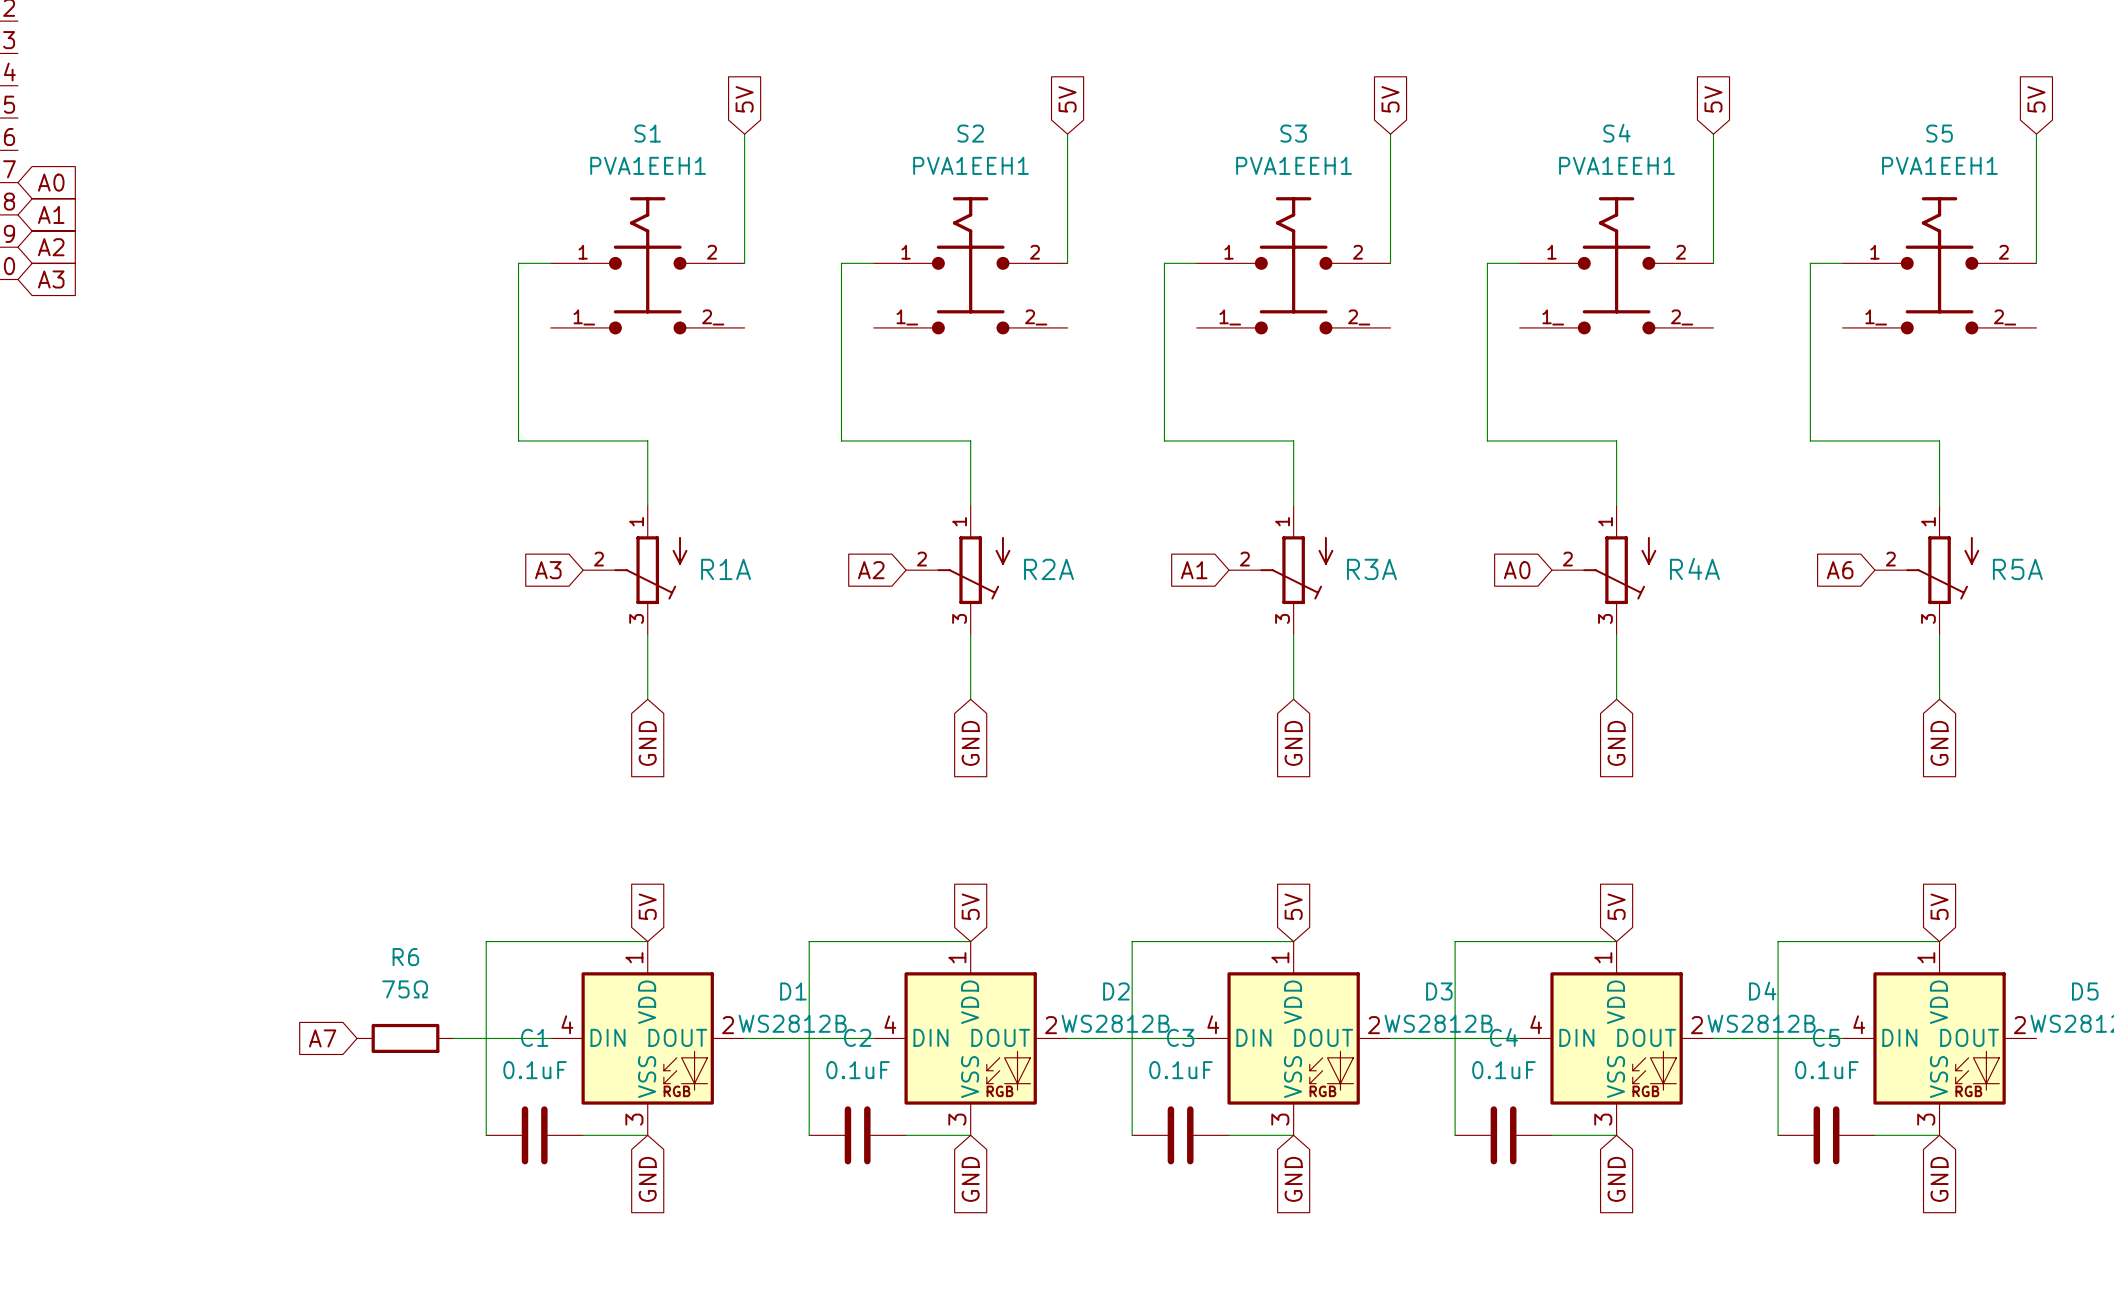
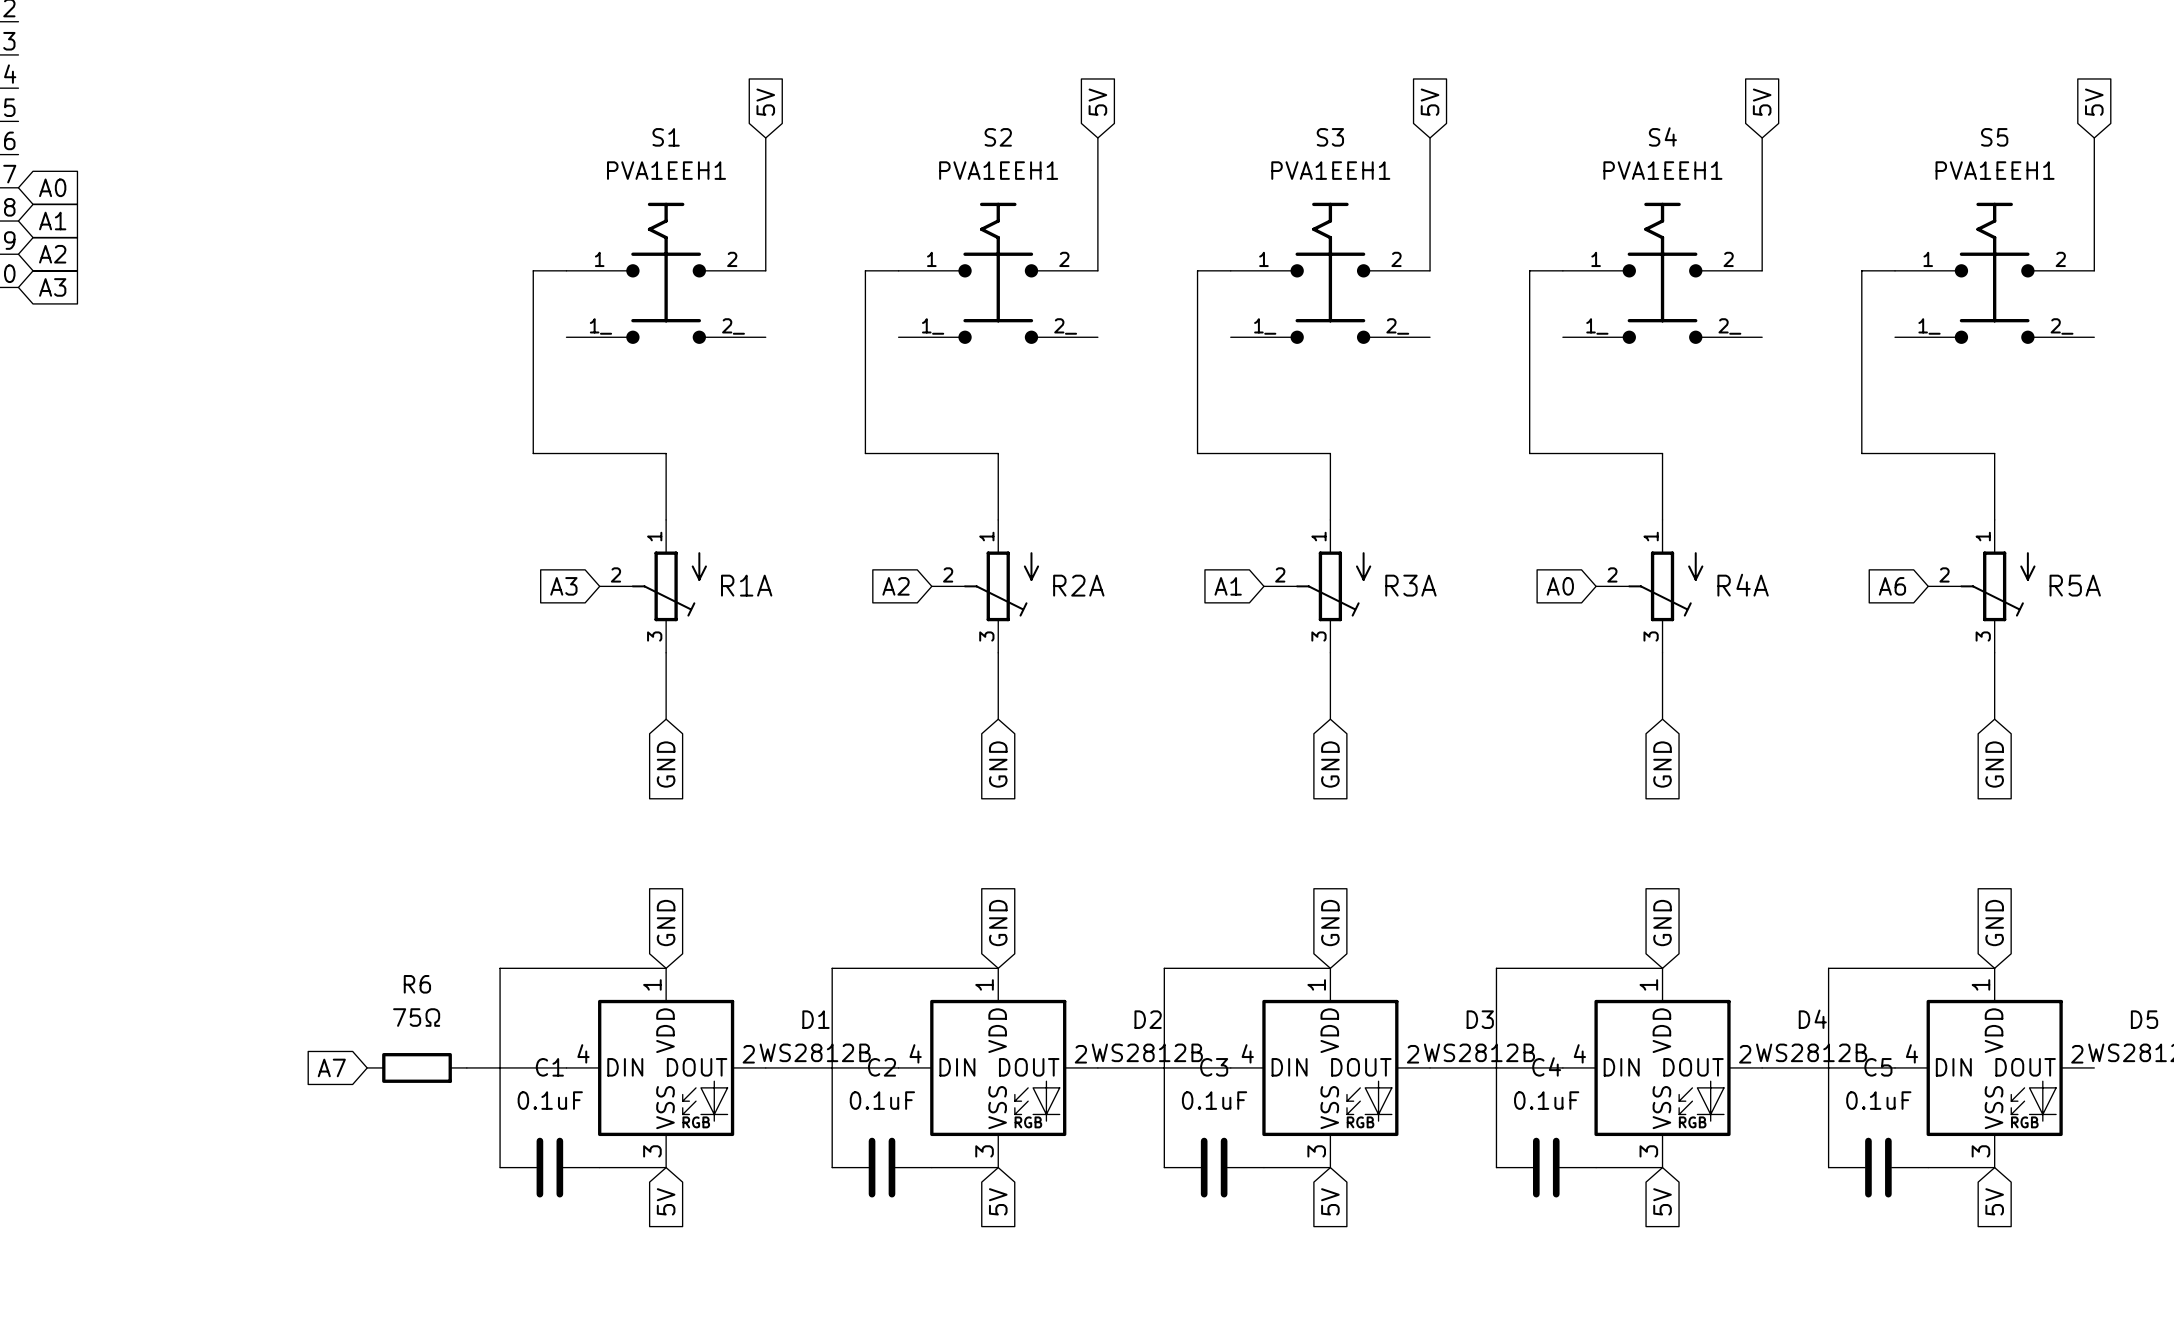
global label: 5V (647, 906) -> GND (666, 923)
global label: 5V (970, 906) -> GND (998, 923)
global label: 5V (1293, 906) -> GND (1330, 923)
global label: 5V (1616, 906) -> GND (1662, 923)
global label: 5V (1939, 906) -> GND (1994, 923)
global label: GND (647, 1179) -> 5V (666, 1201)
global label: GND (970, 1179) -> 5V (998, 1201)
global label: GND (1293, 1179) -> 5V (1330, 1201)
global label: GND (1616, 1179) -> 5V (1662, 1201)
global label: GND (1939, 1179) -> 5V (1994, 1201)

